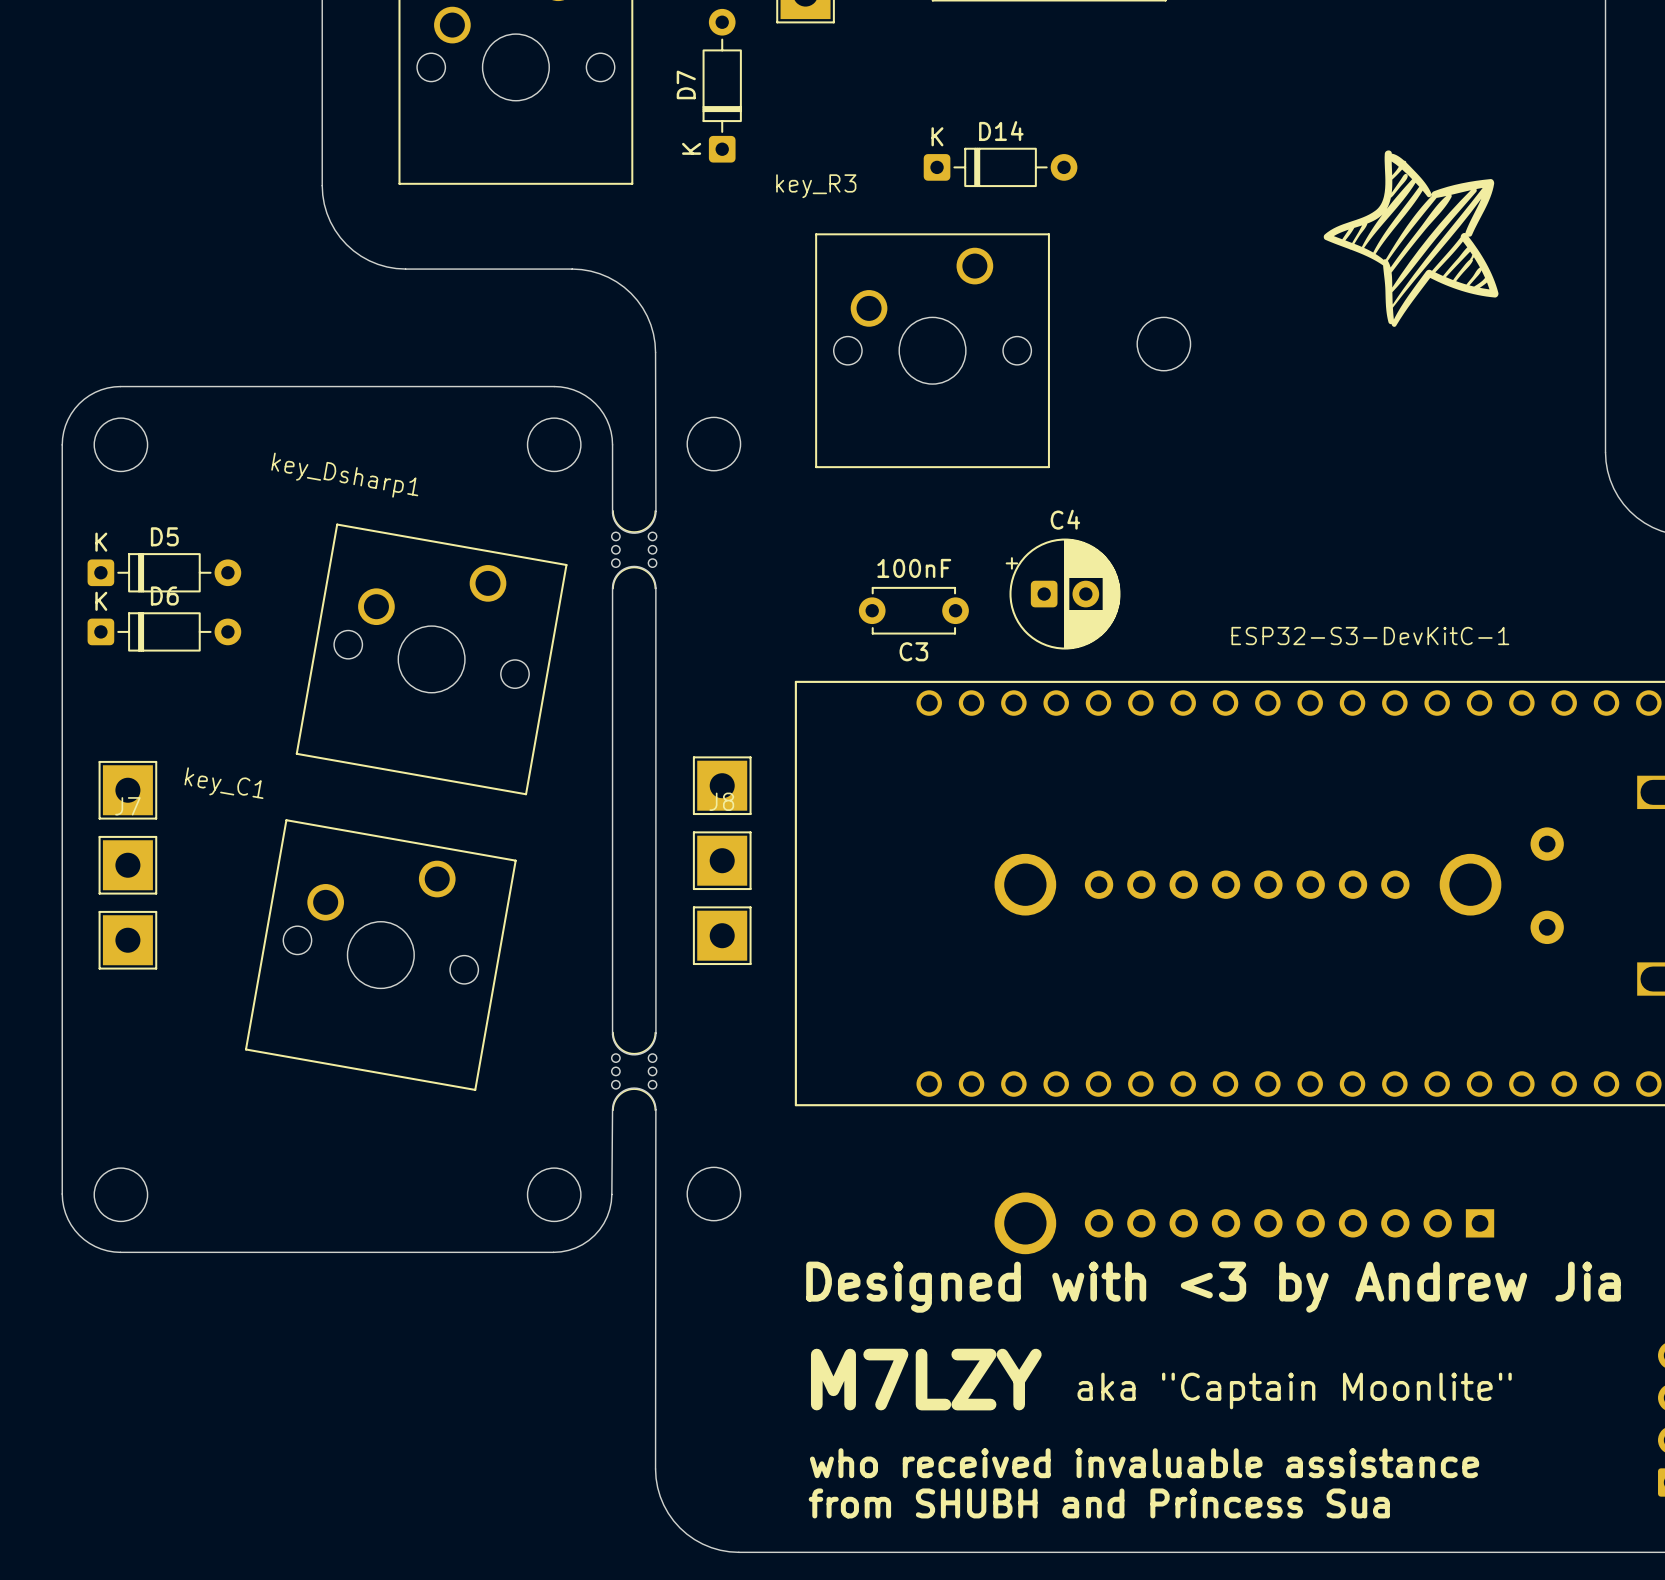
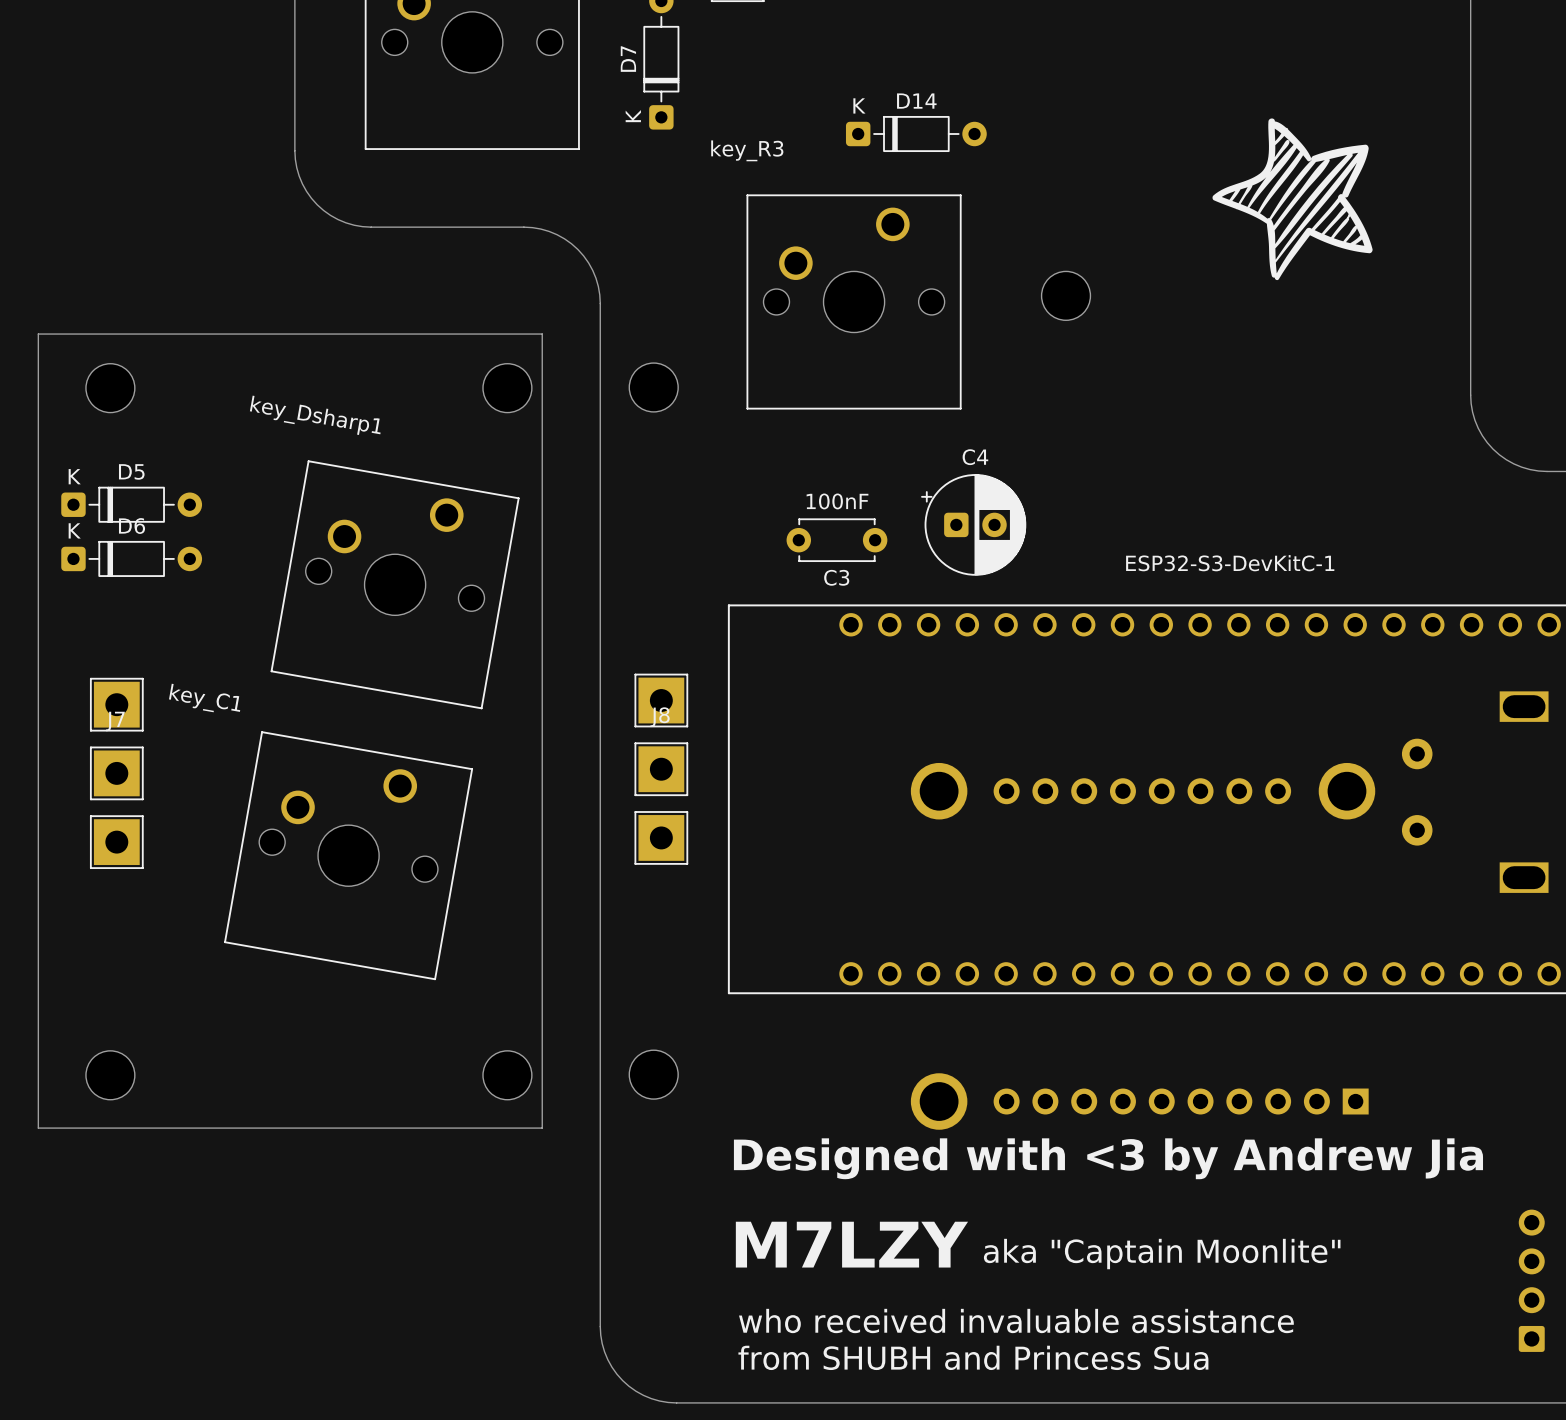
board edge: (655, 352) (655, 514) (649, 526) (637, 532) (629, 532) (621, 529) (616, 523) (612, 515) (612, 438) (606, 419) (590, 399) (567, 388) (120, 386) (101, 389) (89, 395) (71, 413) (65, 425) (62, 444) (62, 1200) (68, 1219) (84, 1239) (101, 1249) (120, 1252) -> (600, 303) (600, 1326)
part: (634, 549) -> none
D5 position: (164, 572) -> (131, 504)
board edge: (612, 588) (612, 1034) (614, 1042) (619, 1049) (626, 1053) (635, 1054) (643, 1052) (649, 1048) (654, 1041) (655, 1033) (655, 588) (653, 578) (648, 571) (634, 566) (624, 568) (617, 573) (612, 588) -> none
D6 position: (164, 631) -> (131, 558)
part: (634, 1071) -> none
board edge: (553, 1252) (568, 1250) (582, 1244) (594, 1235) (603, 1223) (611, 1202) (613, 1104) (618, 1094) (625, 1089) (634, 1088) (645, 1090) (652, 1098) (655, 1109) (655, 1469) -> (506, 1128) (542, 1128) (542, 334) (38, 334) (38, 1128) (110, 1128)

